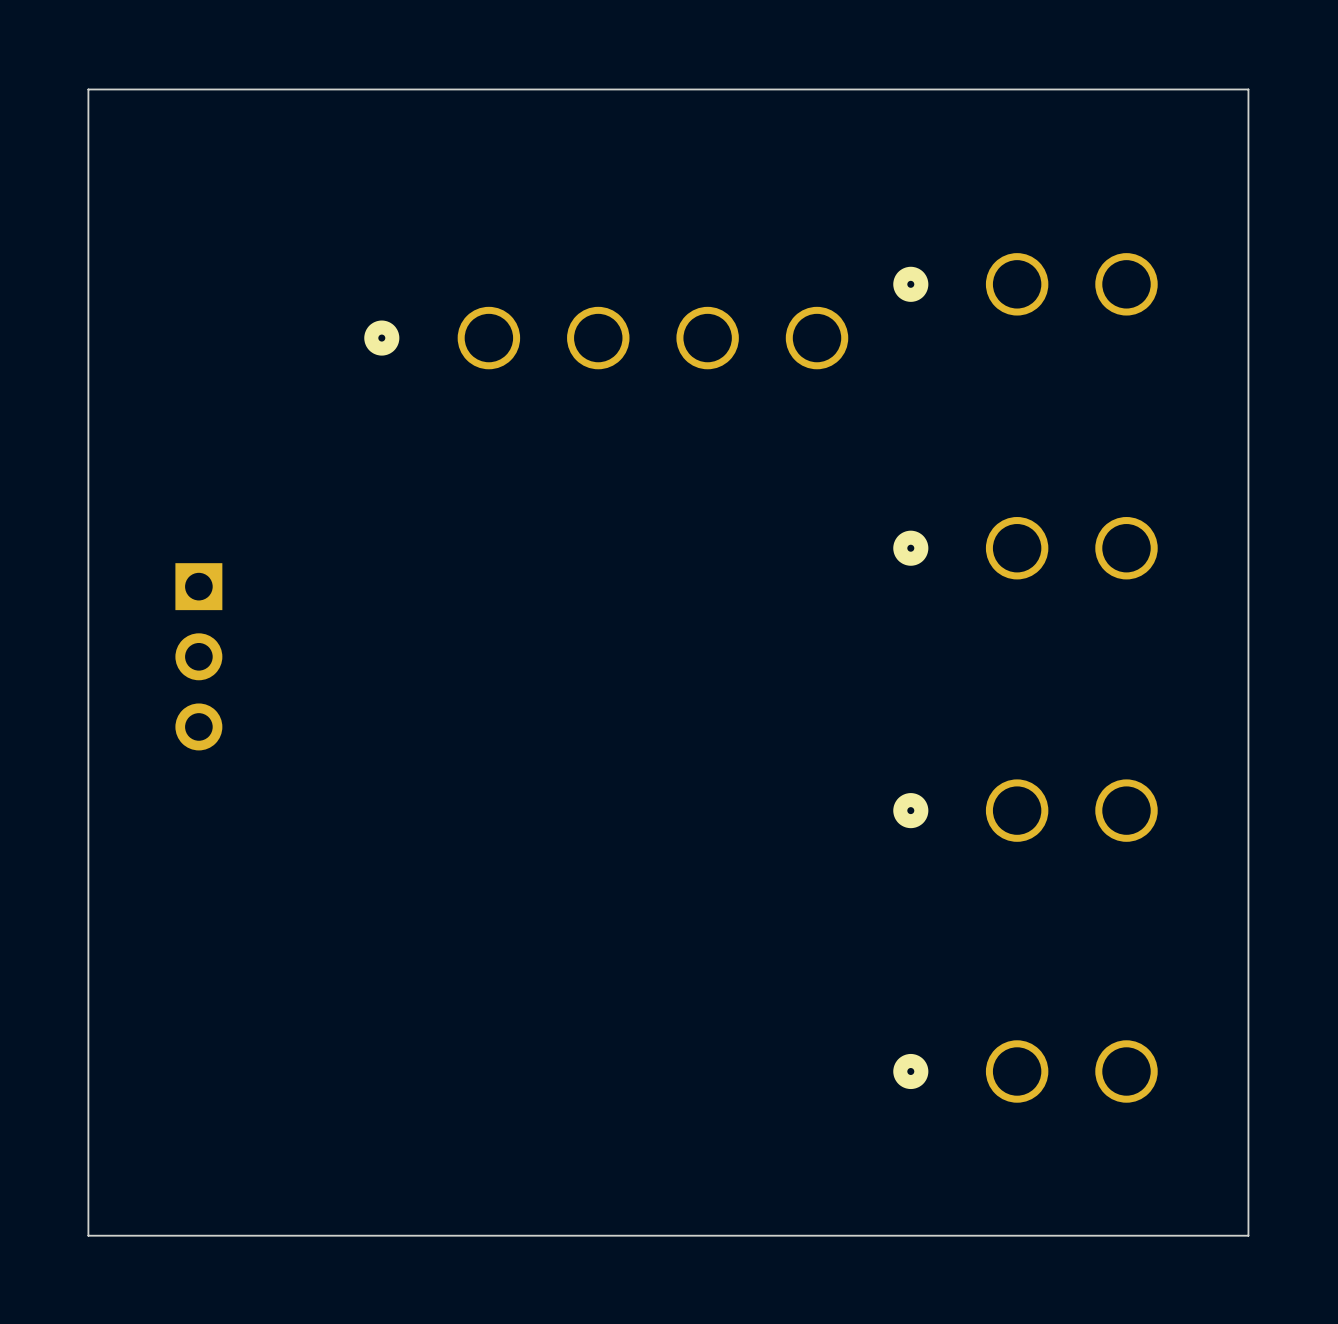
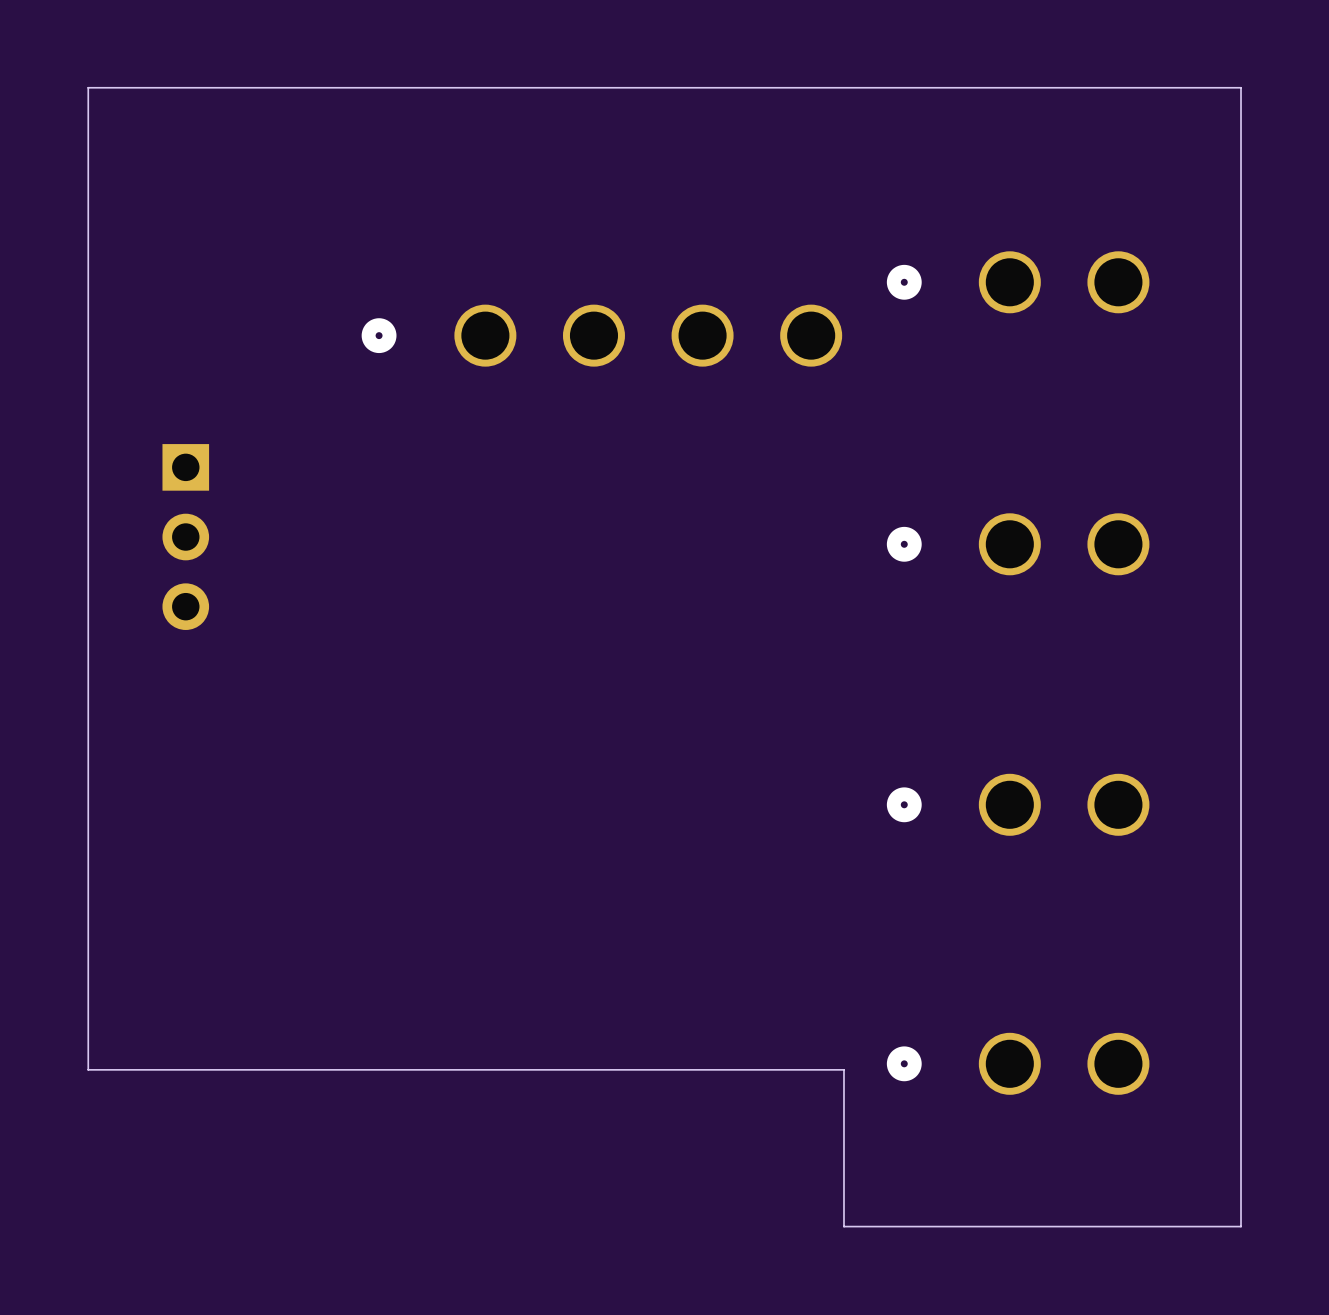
board edge: (1248, 89) (88, 89) (88, 1235) (1248, 1235) (1248, 89) -> (1241, 87) (1241, 1226) (843, 1226) (843, 1069) (88, 1069) (88, 87) (1241, 87)
part position: (198, 656) -> (185, 537)

